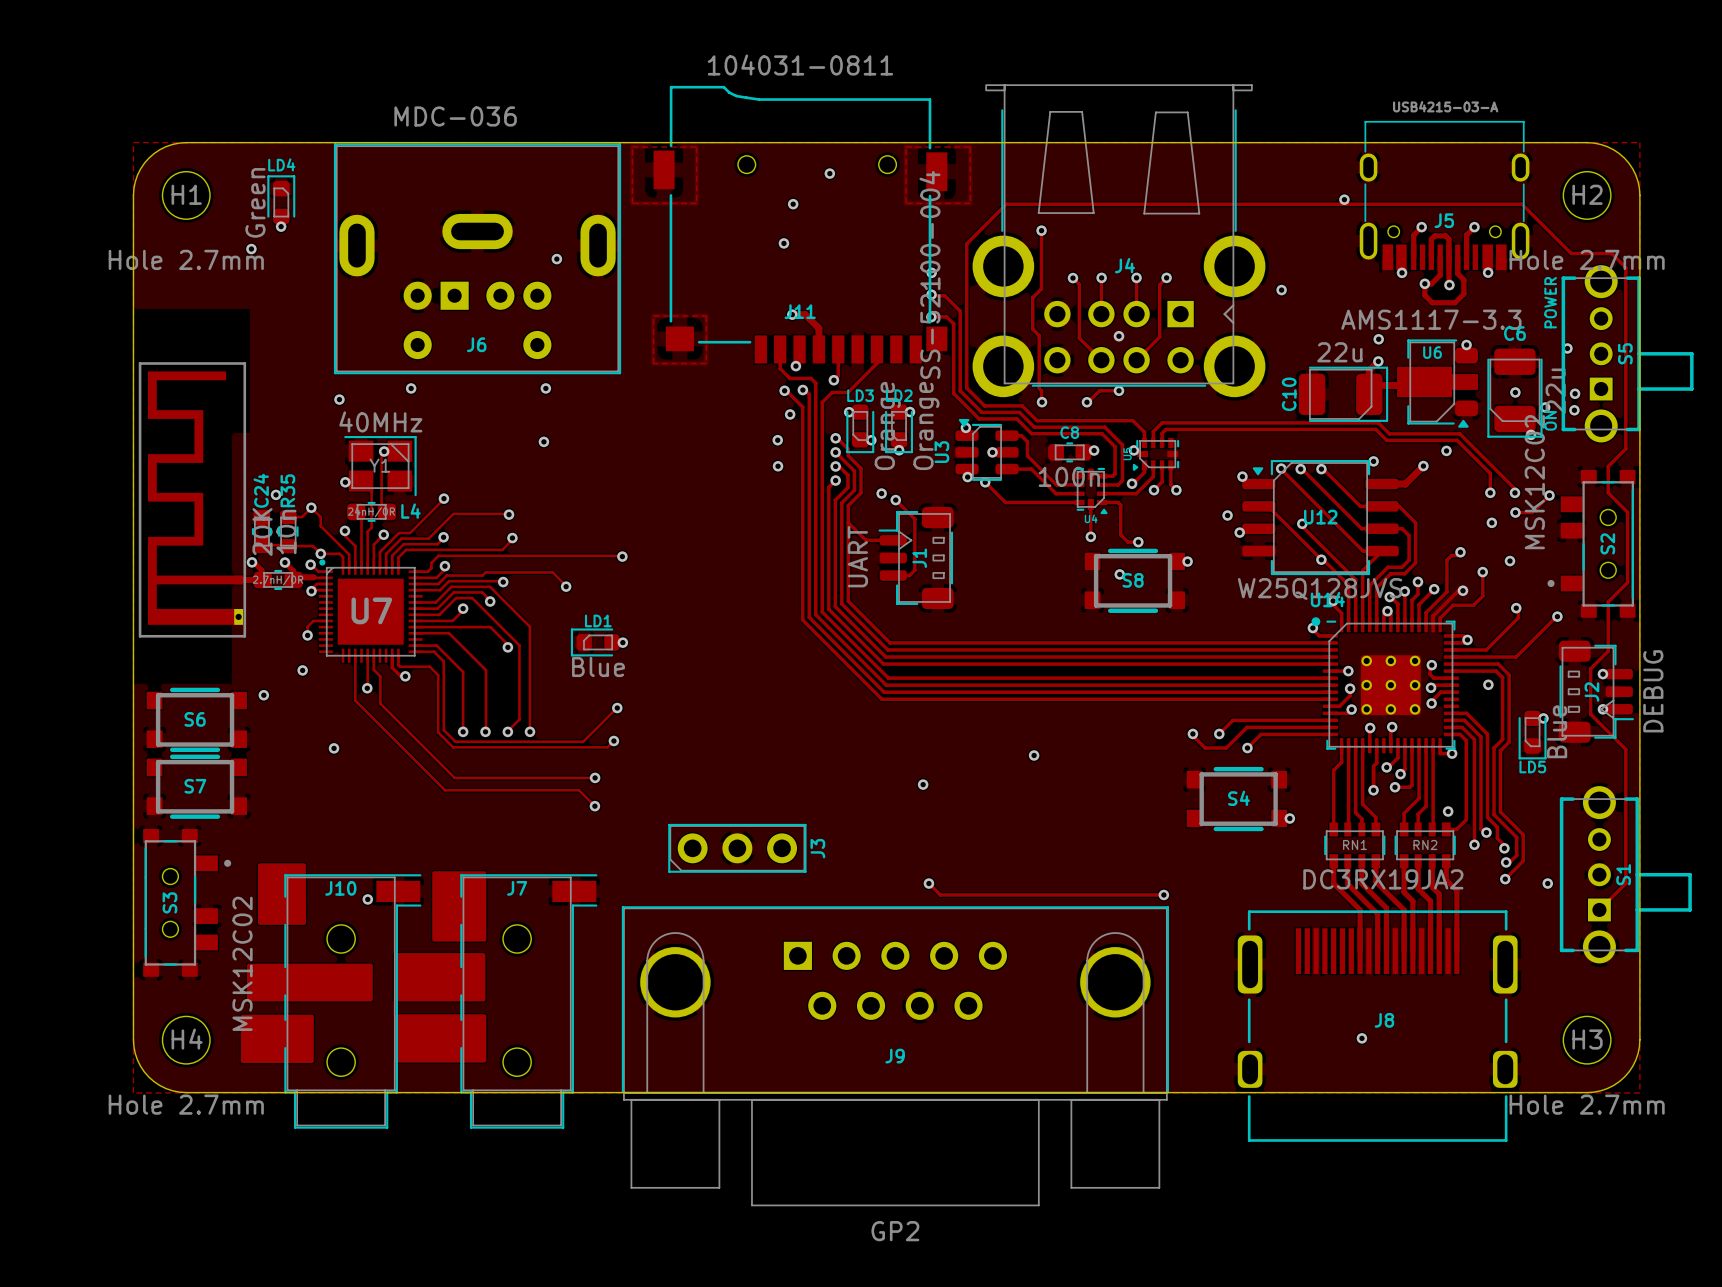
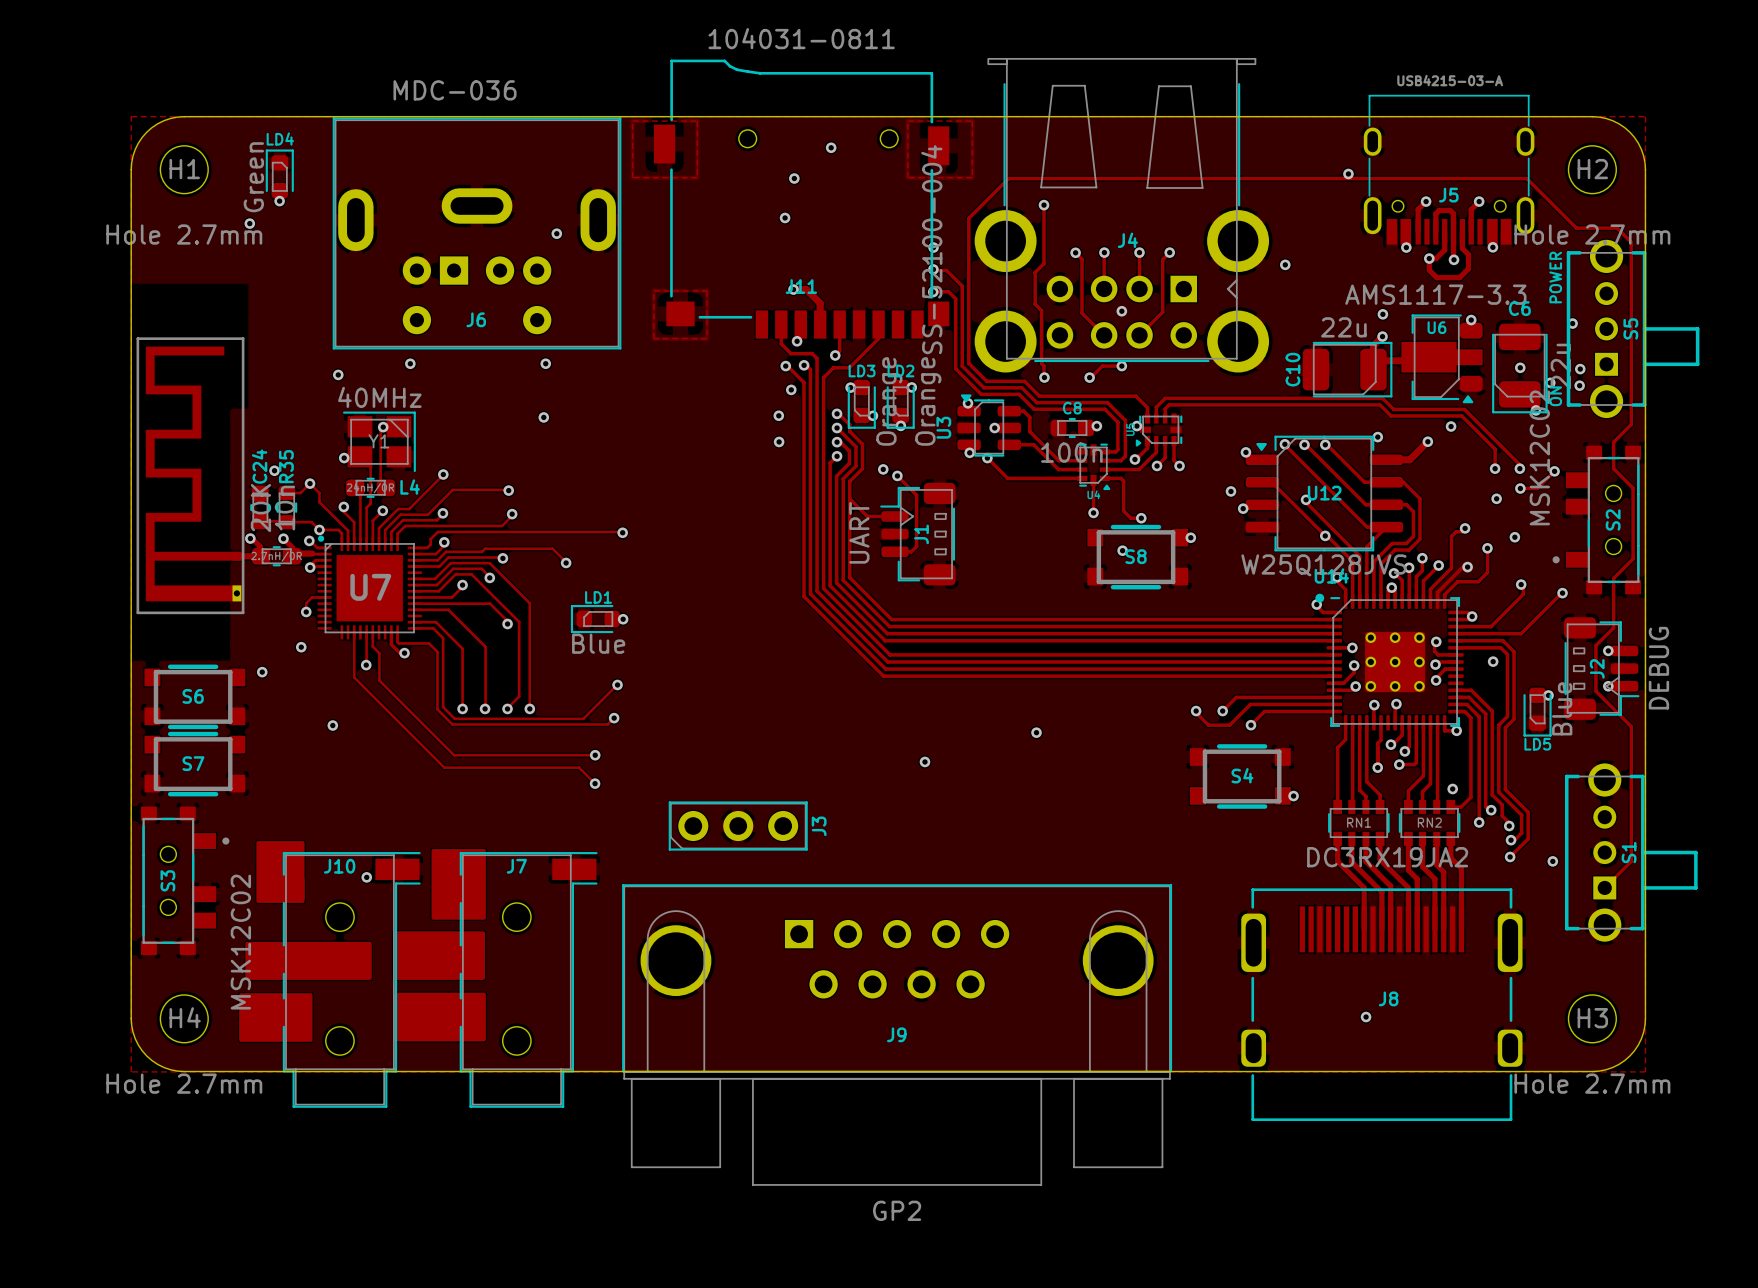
track: (928, 883) (940, 894) (1163, 894) -> none
via: (928, 883) -> none
via: (1163, 894) -> none

